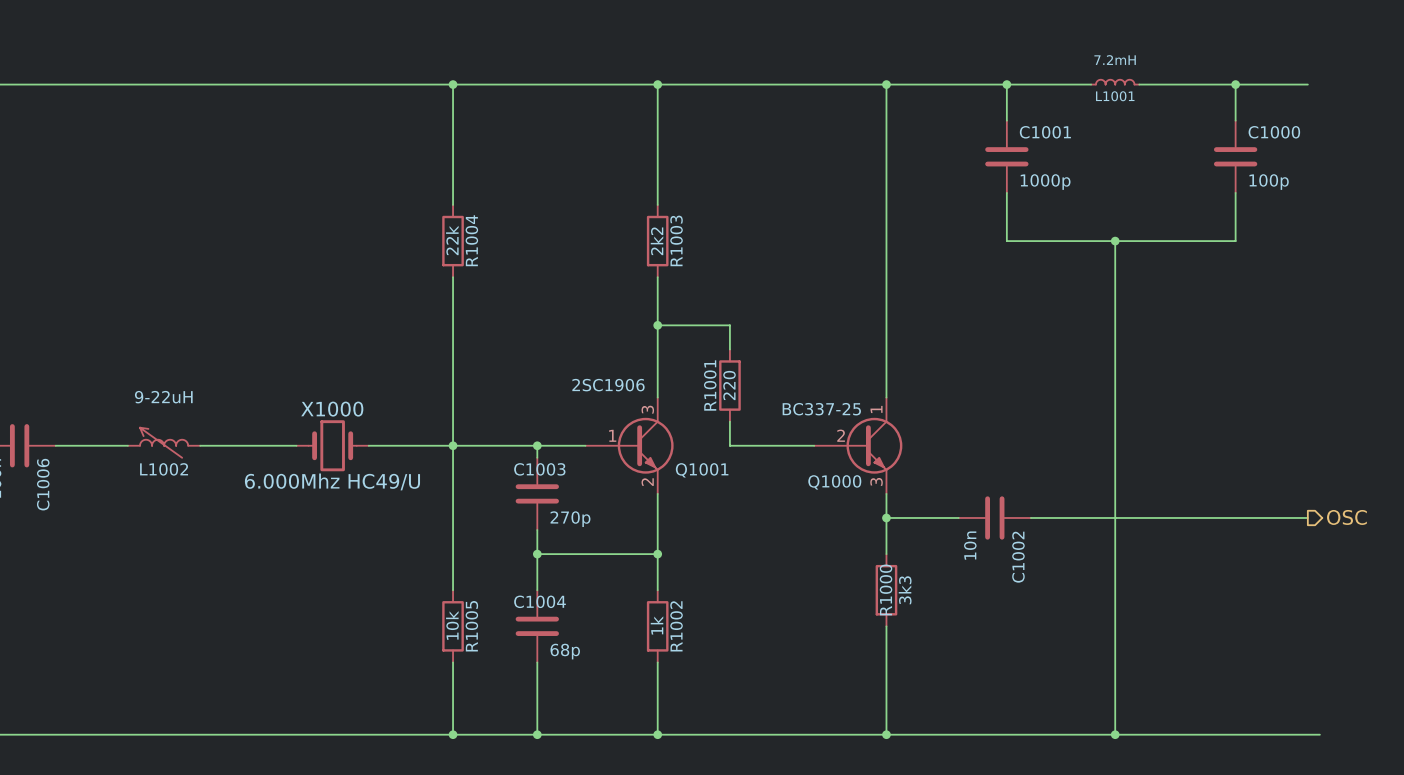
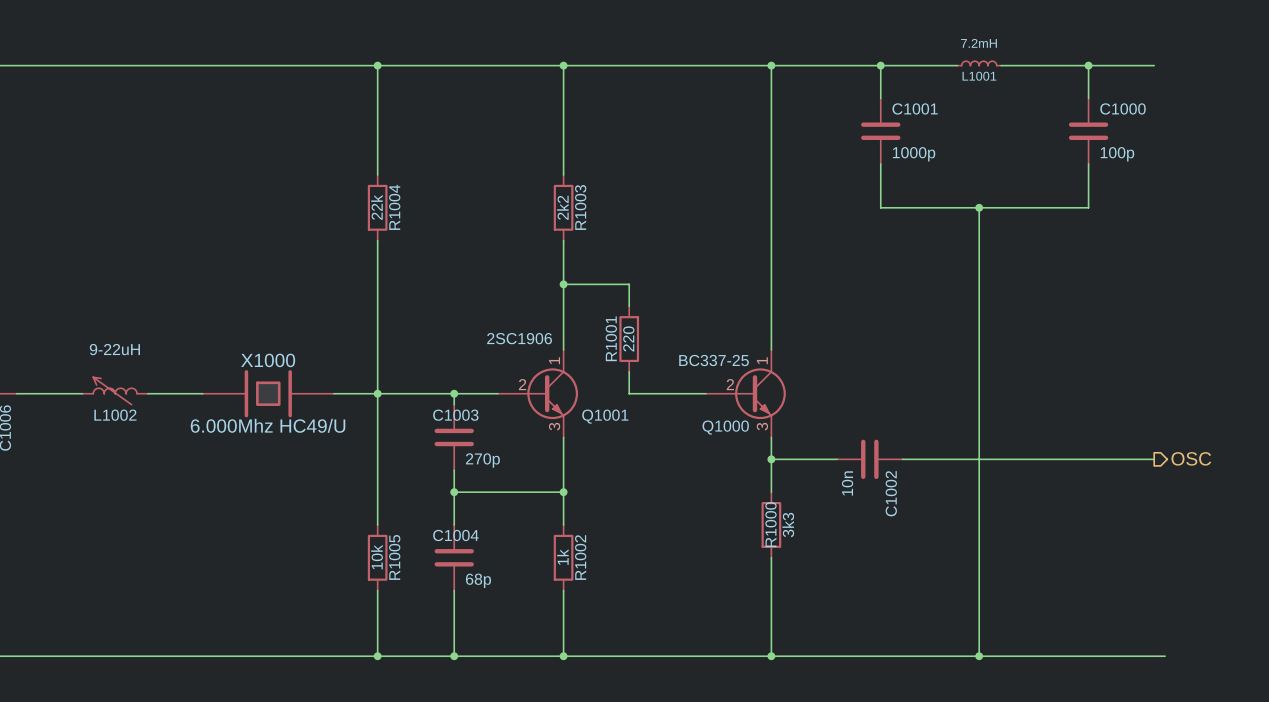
Q1001 pin number: 3 (647, 409) -> 1 (554, 360)
X1000 symbol: [296, 420, 369, 472] -> [202, 370, 334, 418]
Q1001 pin number: 1 (612, 435) -> 2 (522, 384)
Q1001 pin number: 2 (647, 482) -> 3 (554, 426)

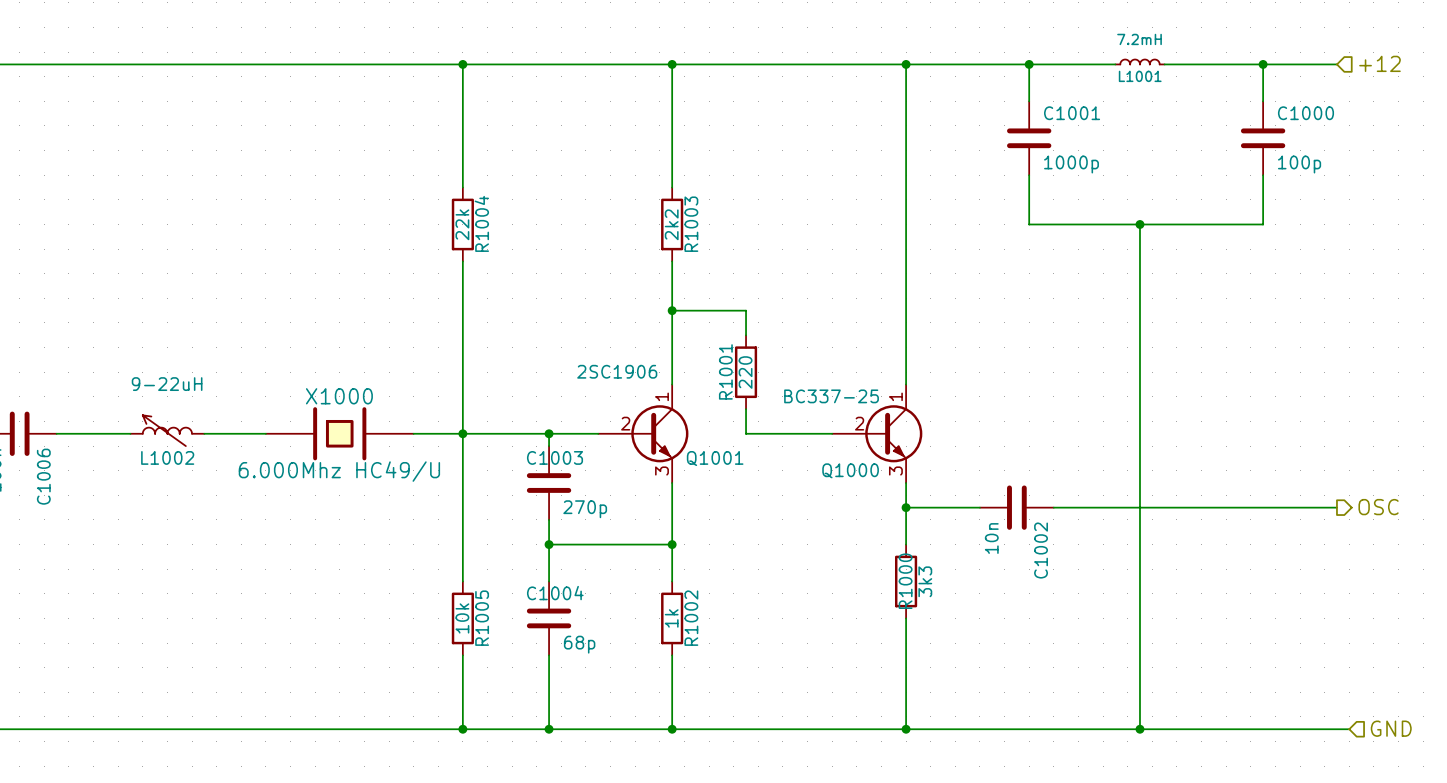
hierarchical label: none -> +12 (1379, 63)
hierarchical label: none -> GND (1391, 728)

